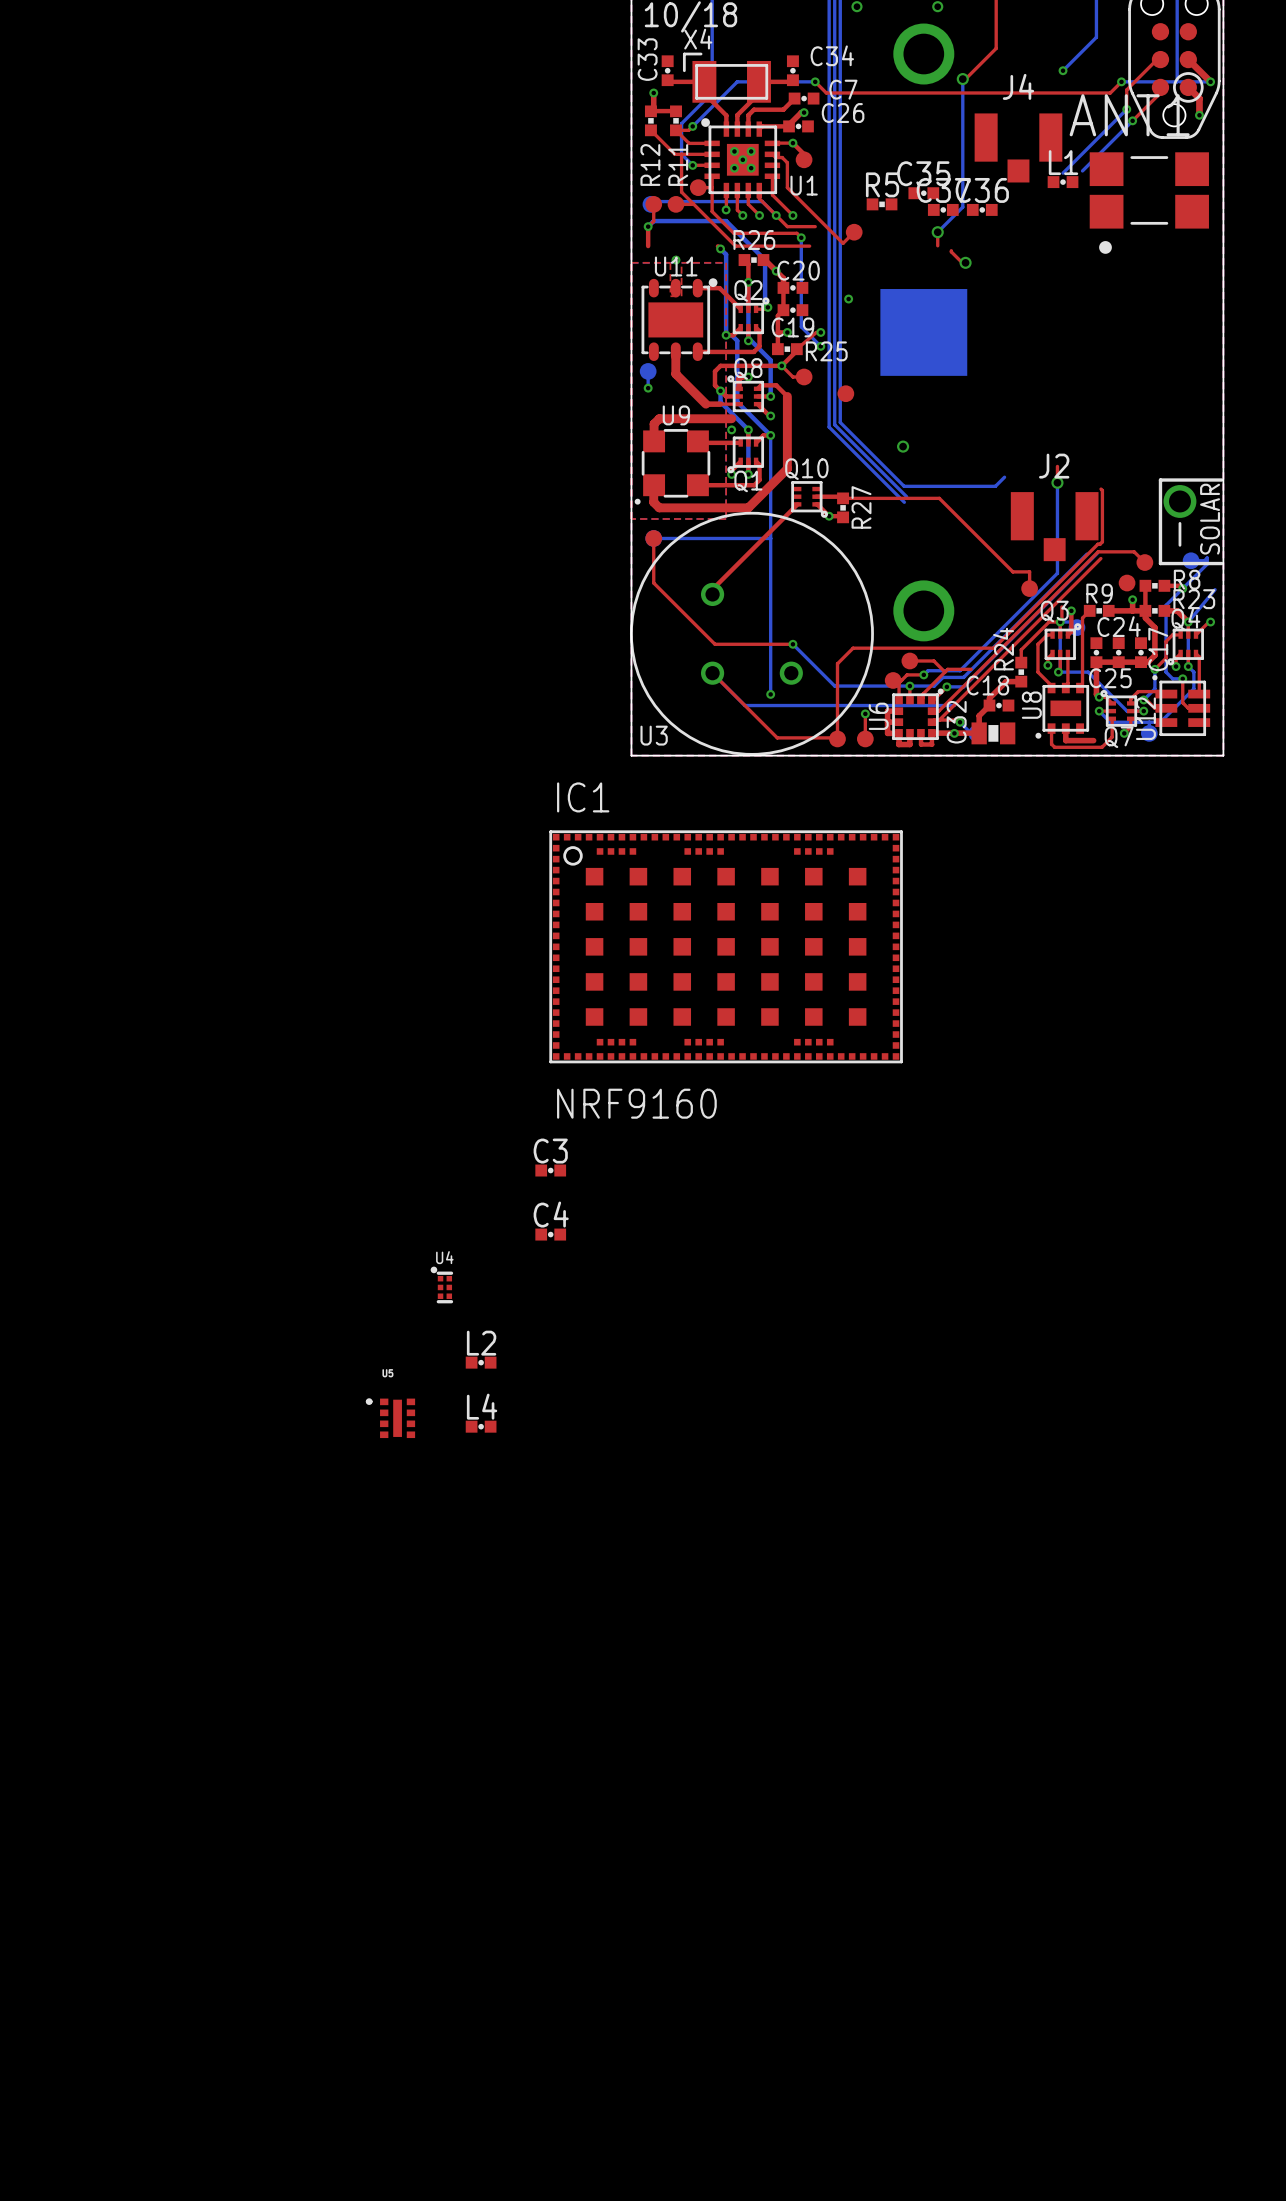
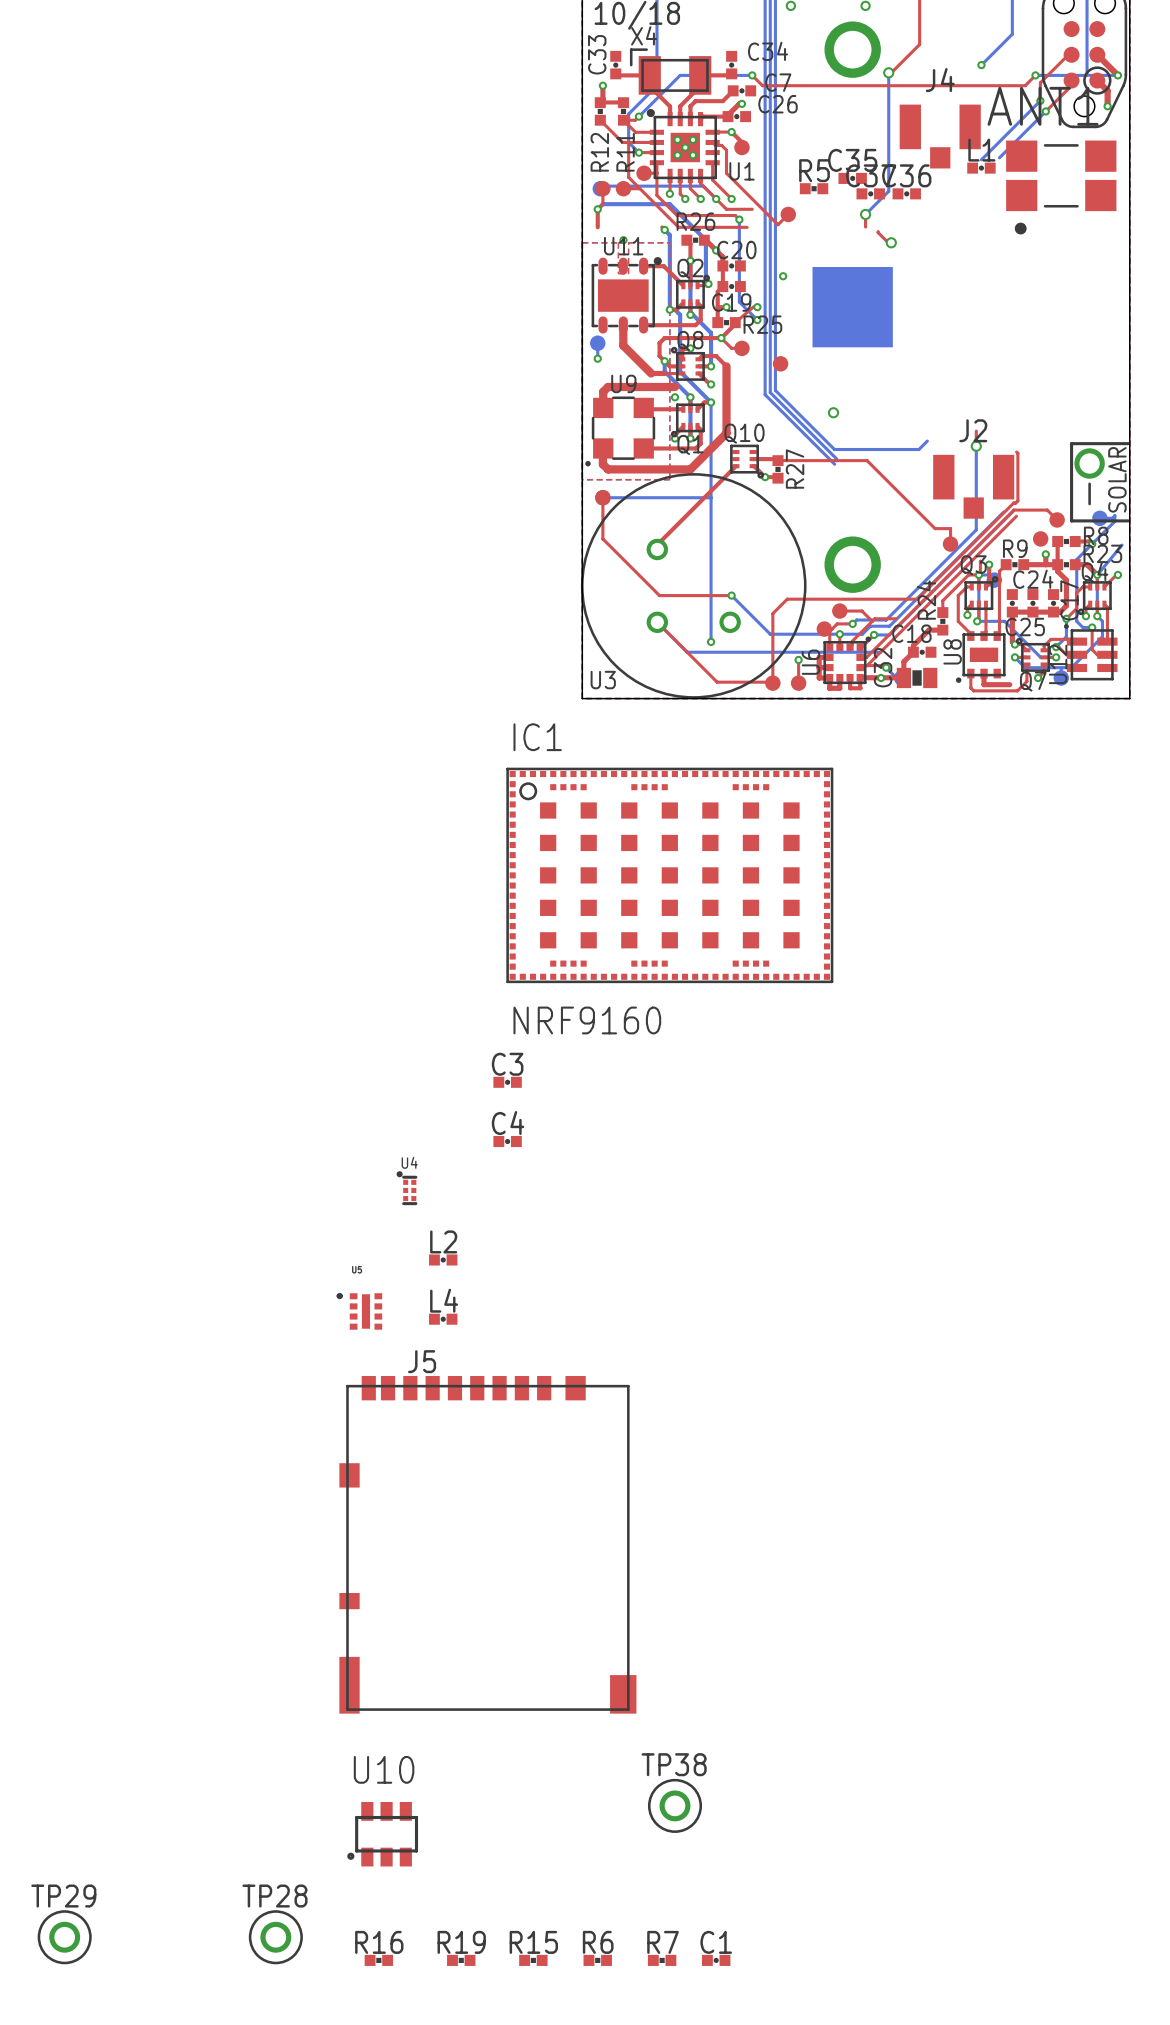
J5: none -> (487, 1544)
TP38: none -> (675, 1805)
U10: none -> (382, 1834)
TP29: none -> (64, 1937)
TP28: none -> (275, 1937)
R16: none -> (378, 1960)
R19: none -> (461, 1960)
R15: none -> (533, 1960)
R6: none -> (597, 1960)
R7: none -> (662, 1960)
C1: none -> (716, 1960)

